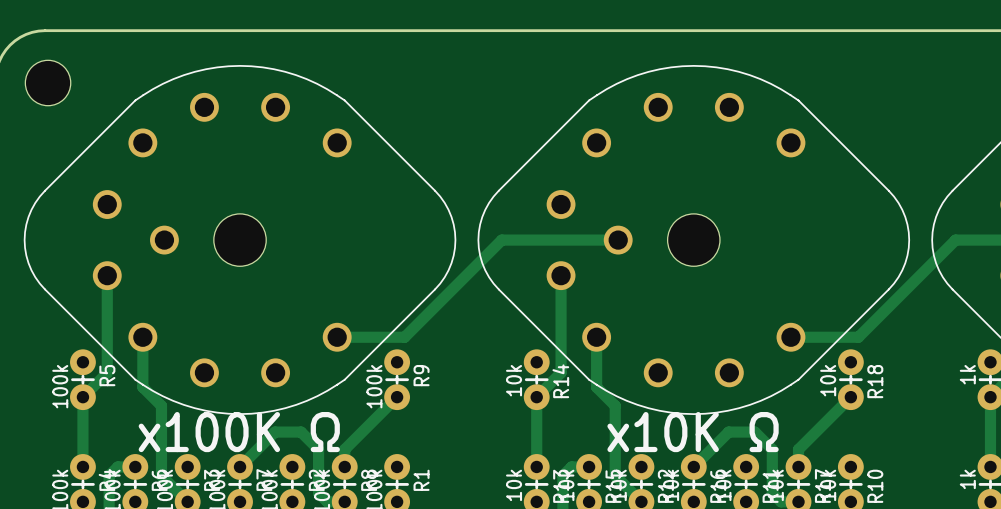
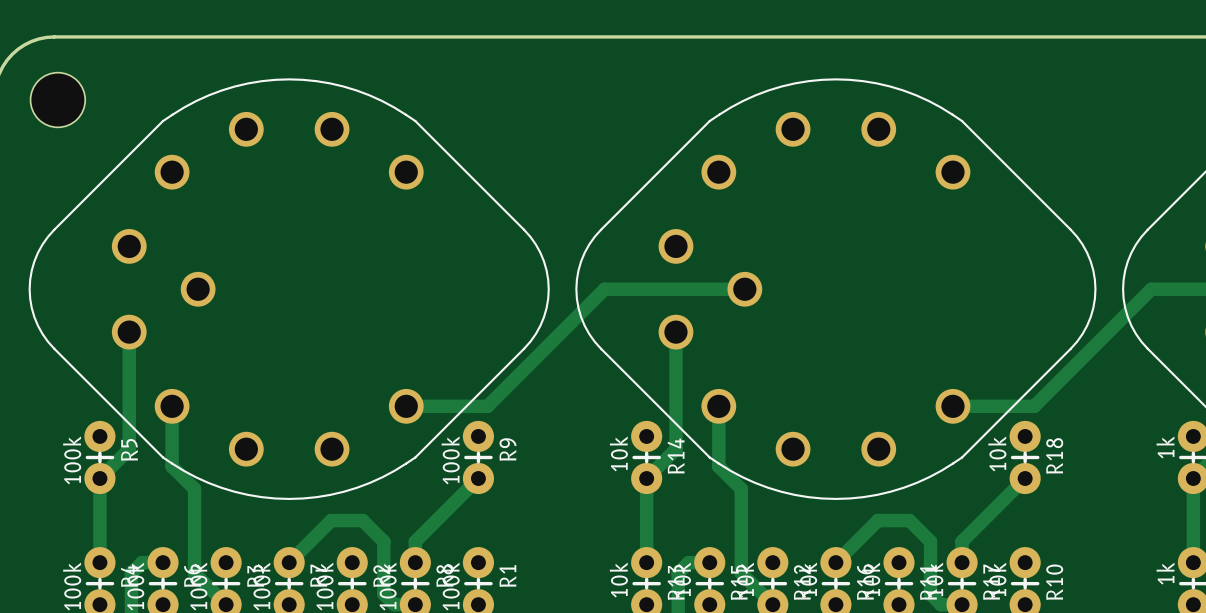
hole: (240, 240) -> none
hole: (693, 240) -> none
text: x100K Ω (239, 432) -> none
text: x10K Ω (693, 432) -> none

